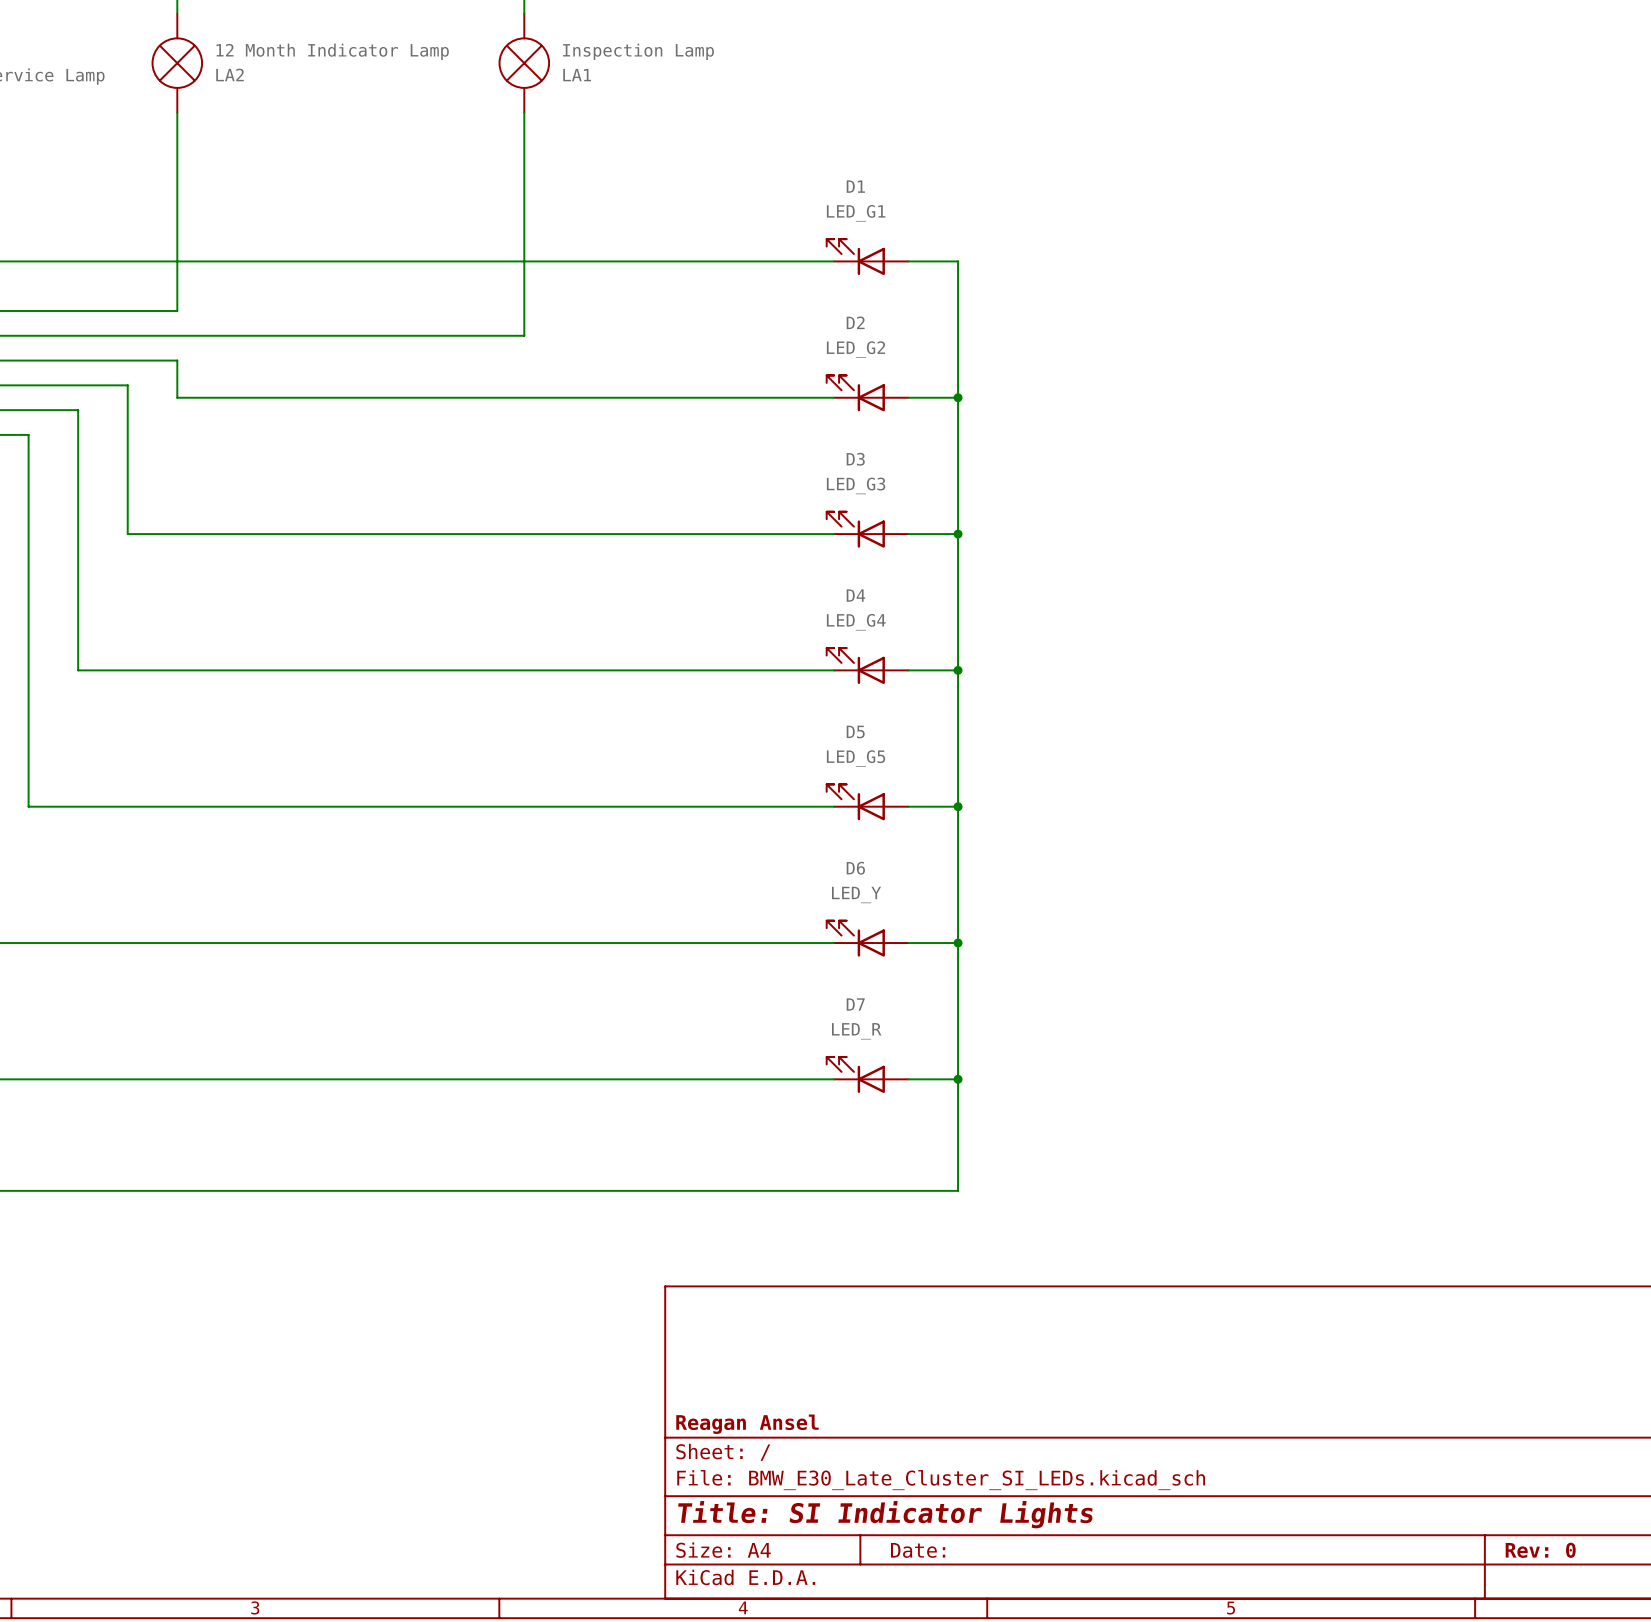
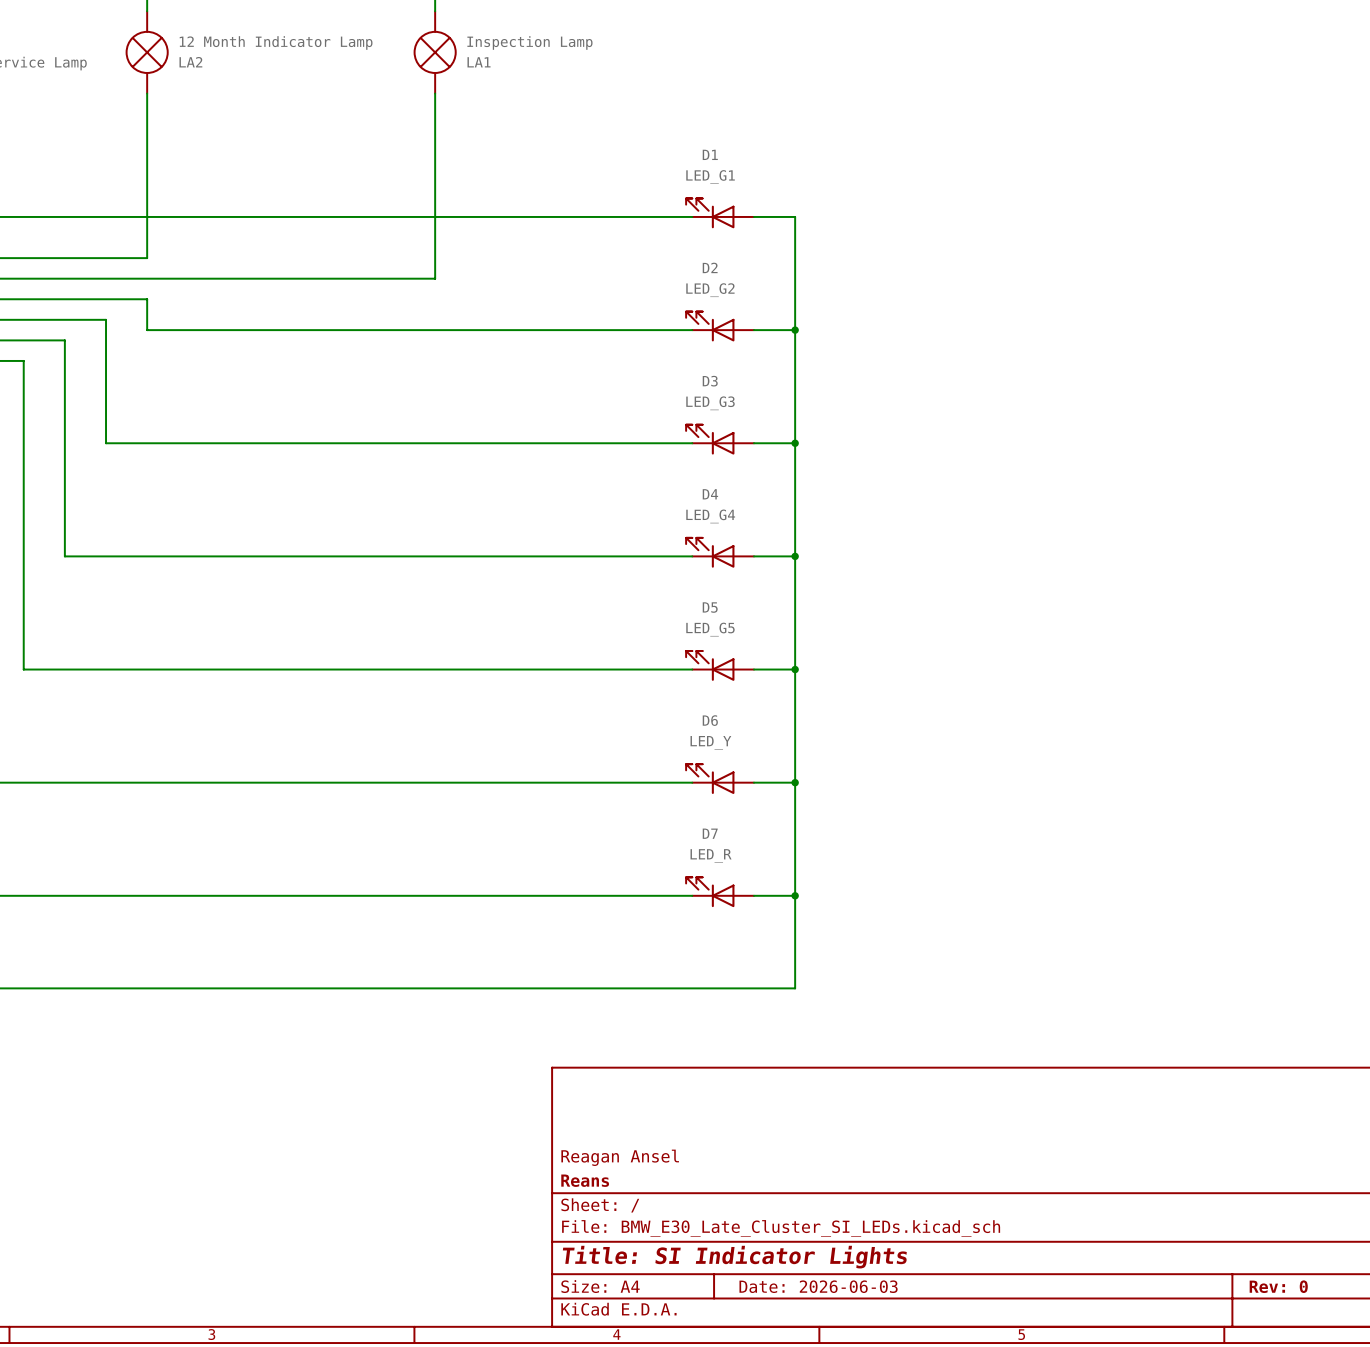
title block: none -> Reagan Ansel (620, 1157)
title block: Reagan Ansel (747, 1424) -> Reans (585, 1180)
title block: Date: (918, 1550) -> Date: 2026-06-03 (818, 1286)

